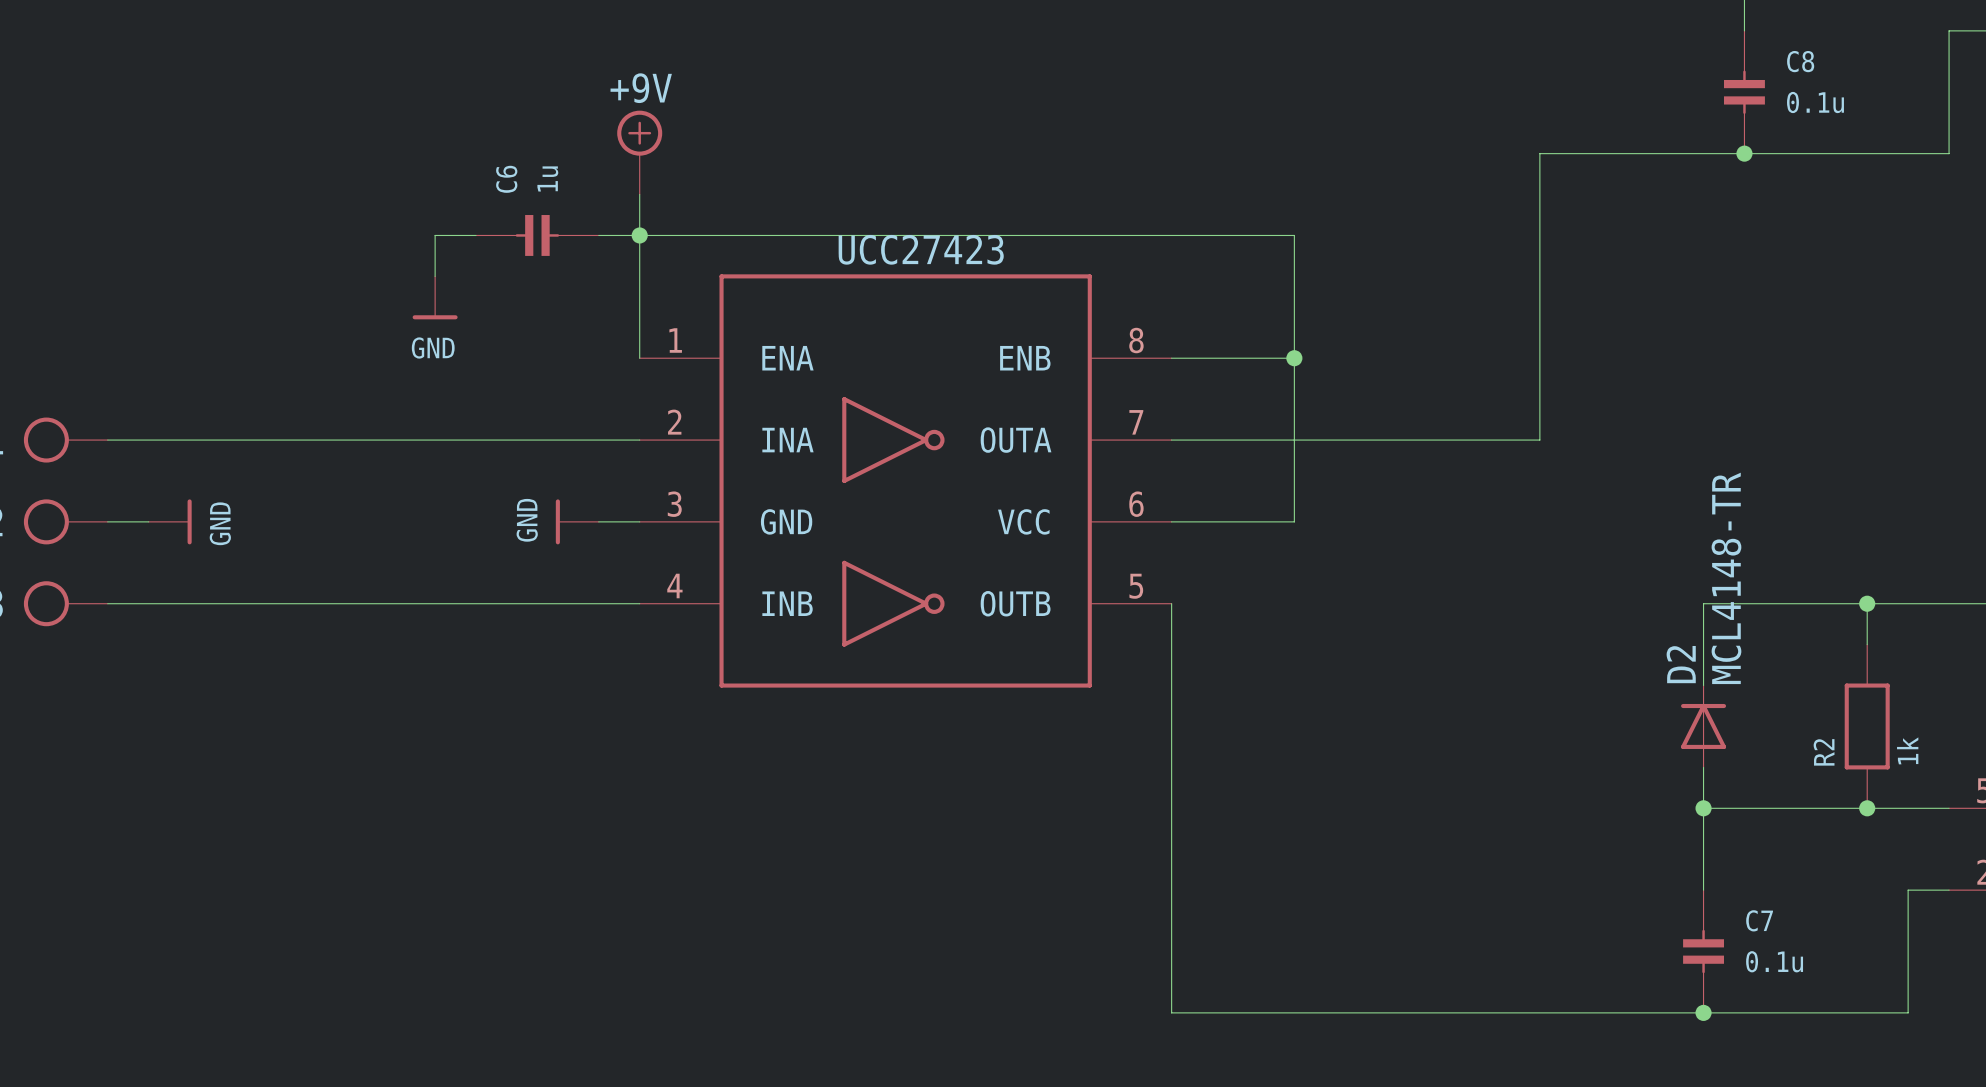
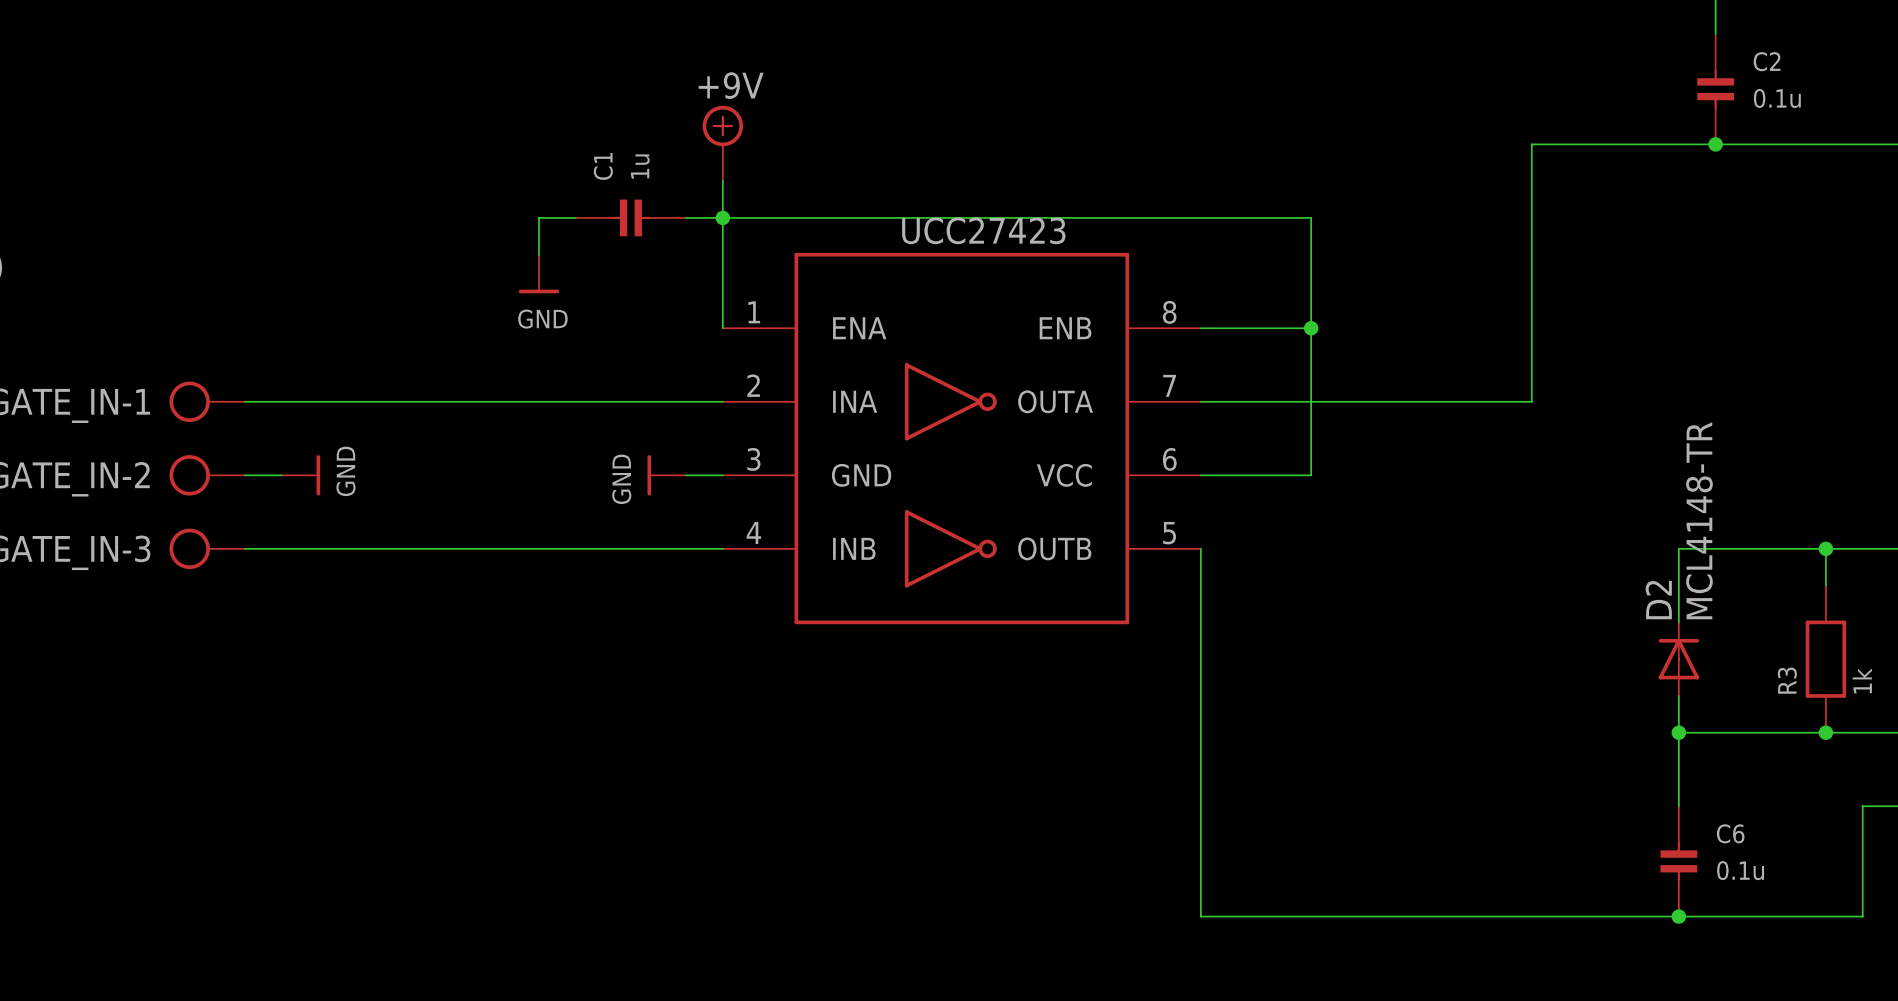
C8 name: C8 (1800, 61) -> C2 (1767, 61)
C6 name: C6 (506, 179) -> C1 (603, 166)
R2 name: R2 (1824, 752) -> R3 (1787, 680)
C7 name: C7 (1759, 920) -> C6 (1730, 833)

